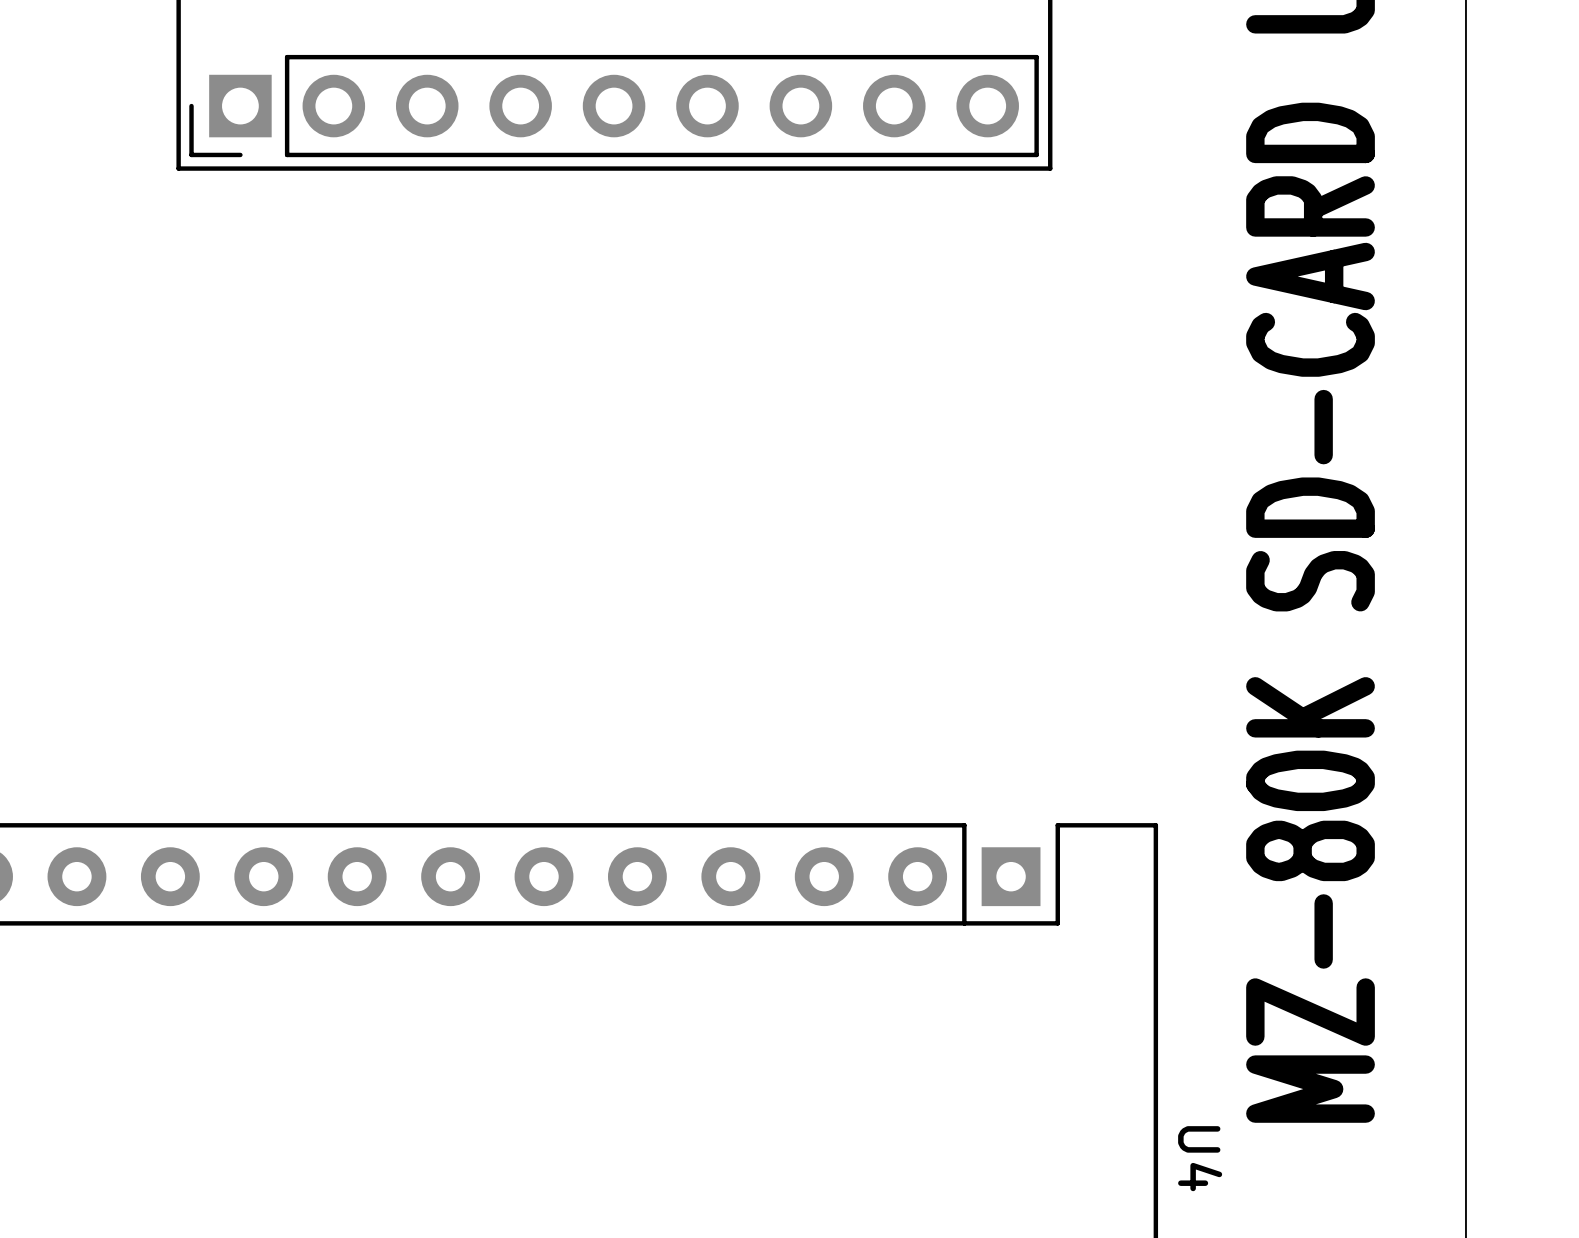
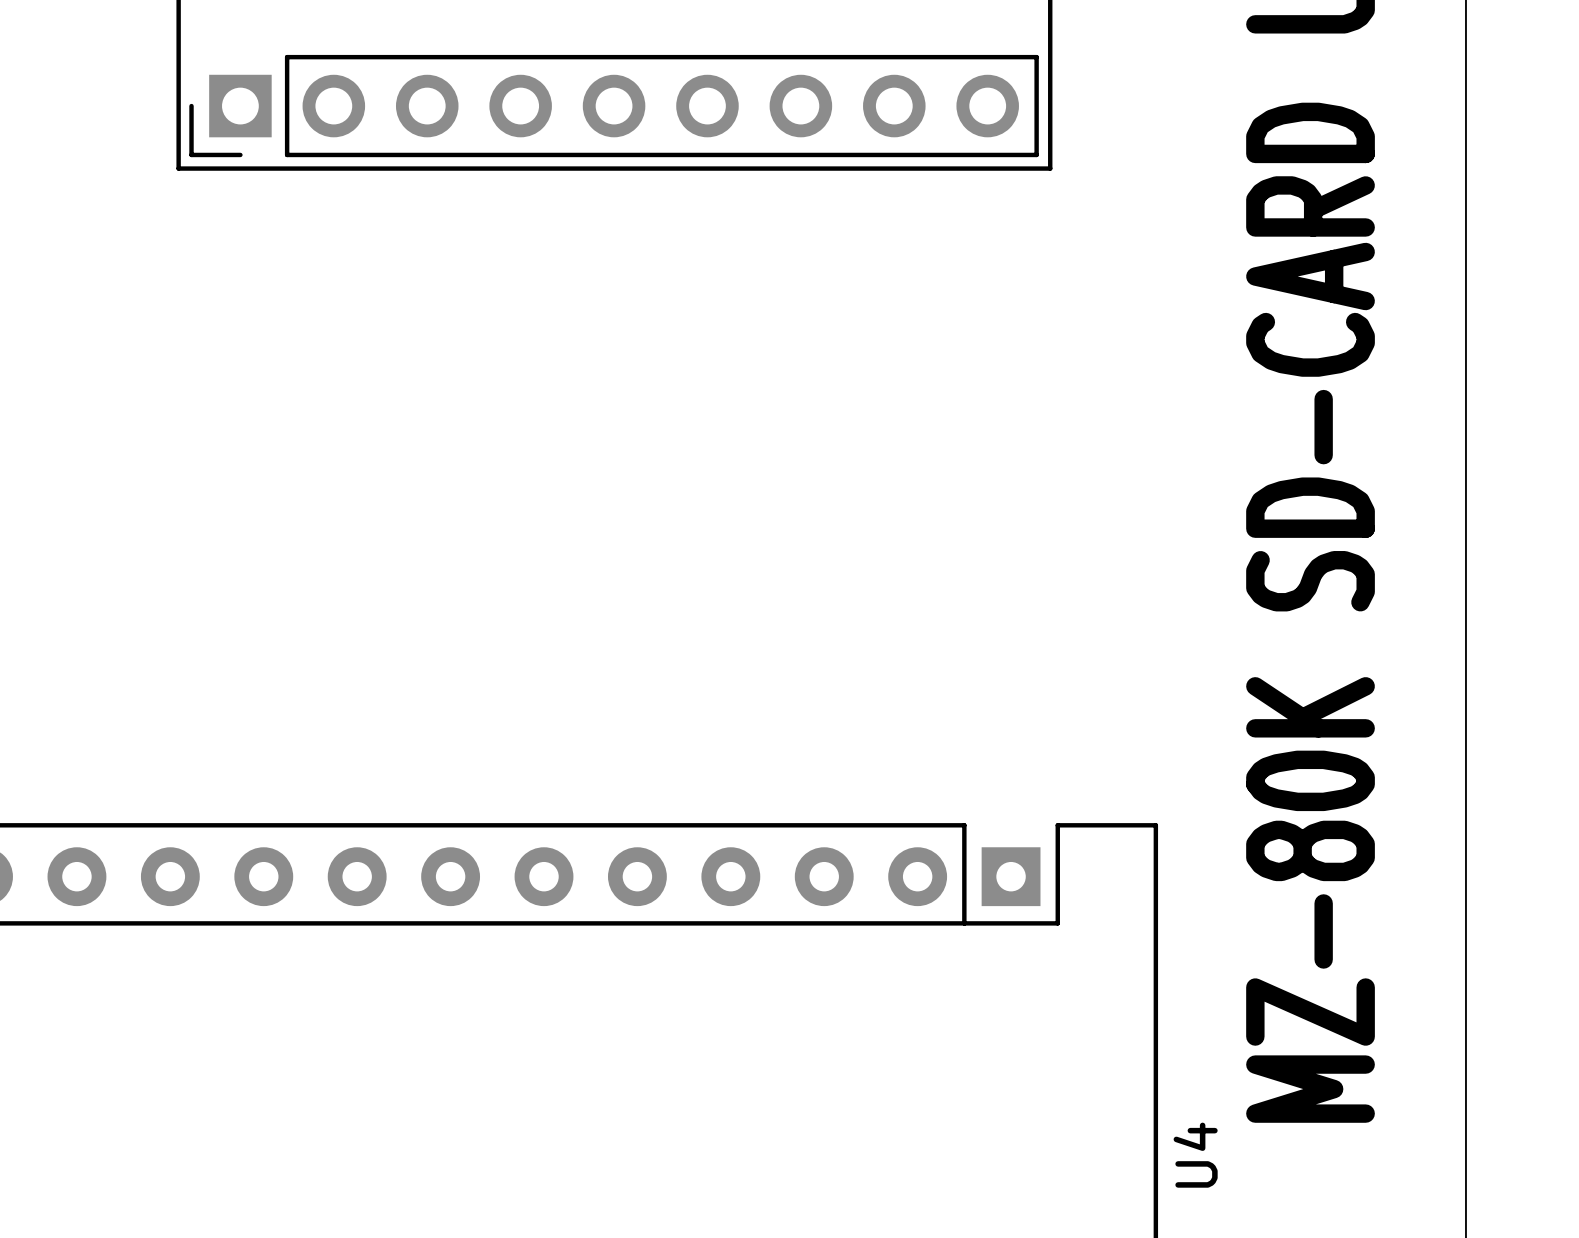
U4 name rotation: 0° (1200, 1158) -> 180° (1195, 1155)

